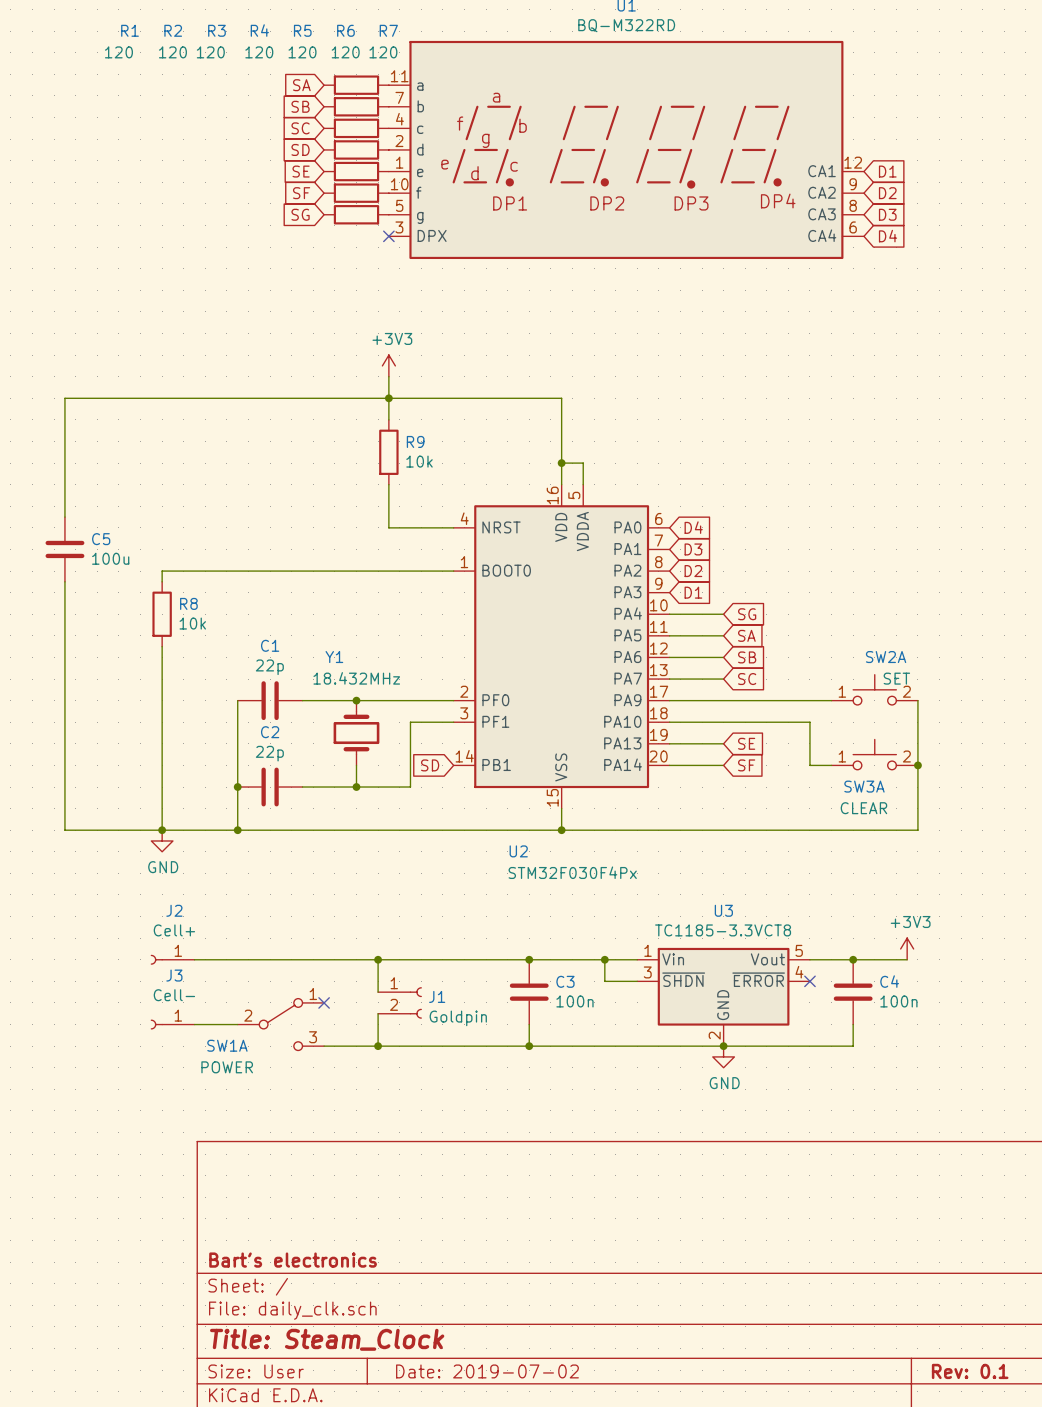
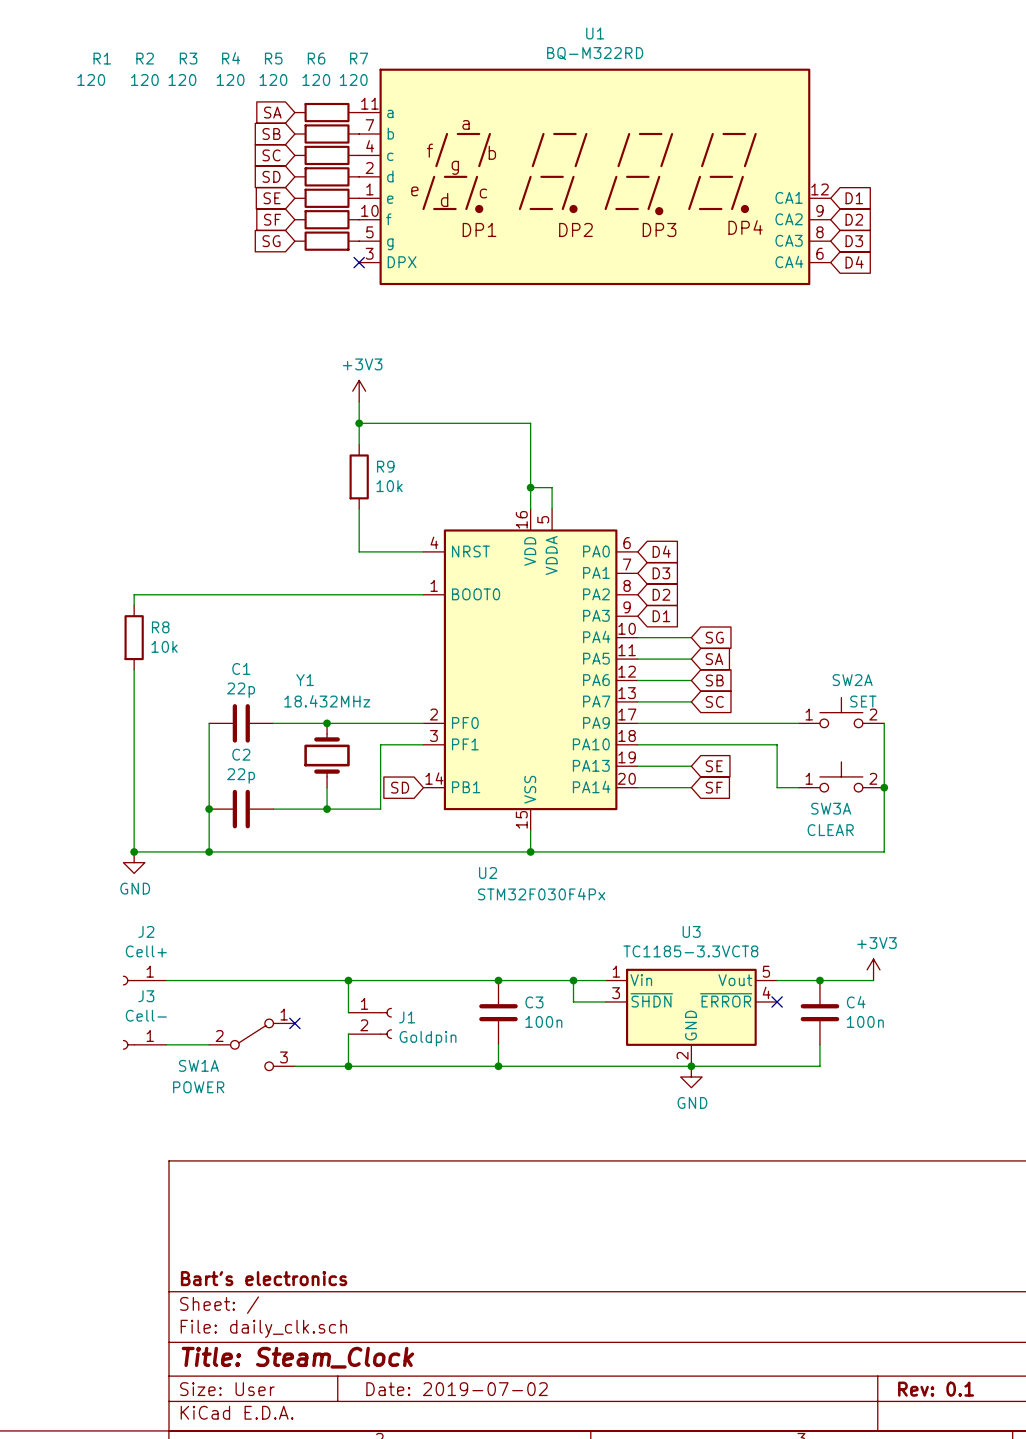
wire: (388, 398) (64, 398) (64, 517) -> none
C5: 100u (64, 549) -> none
wire: (64, 581) (64, 830) (162, 830) -> none

